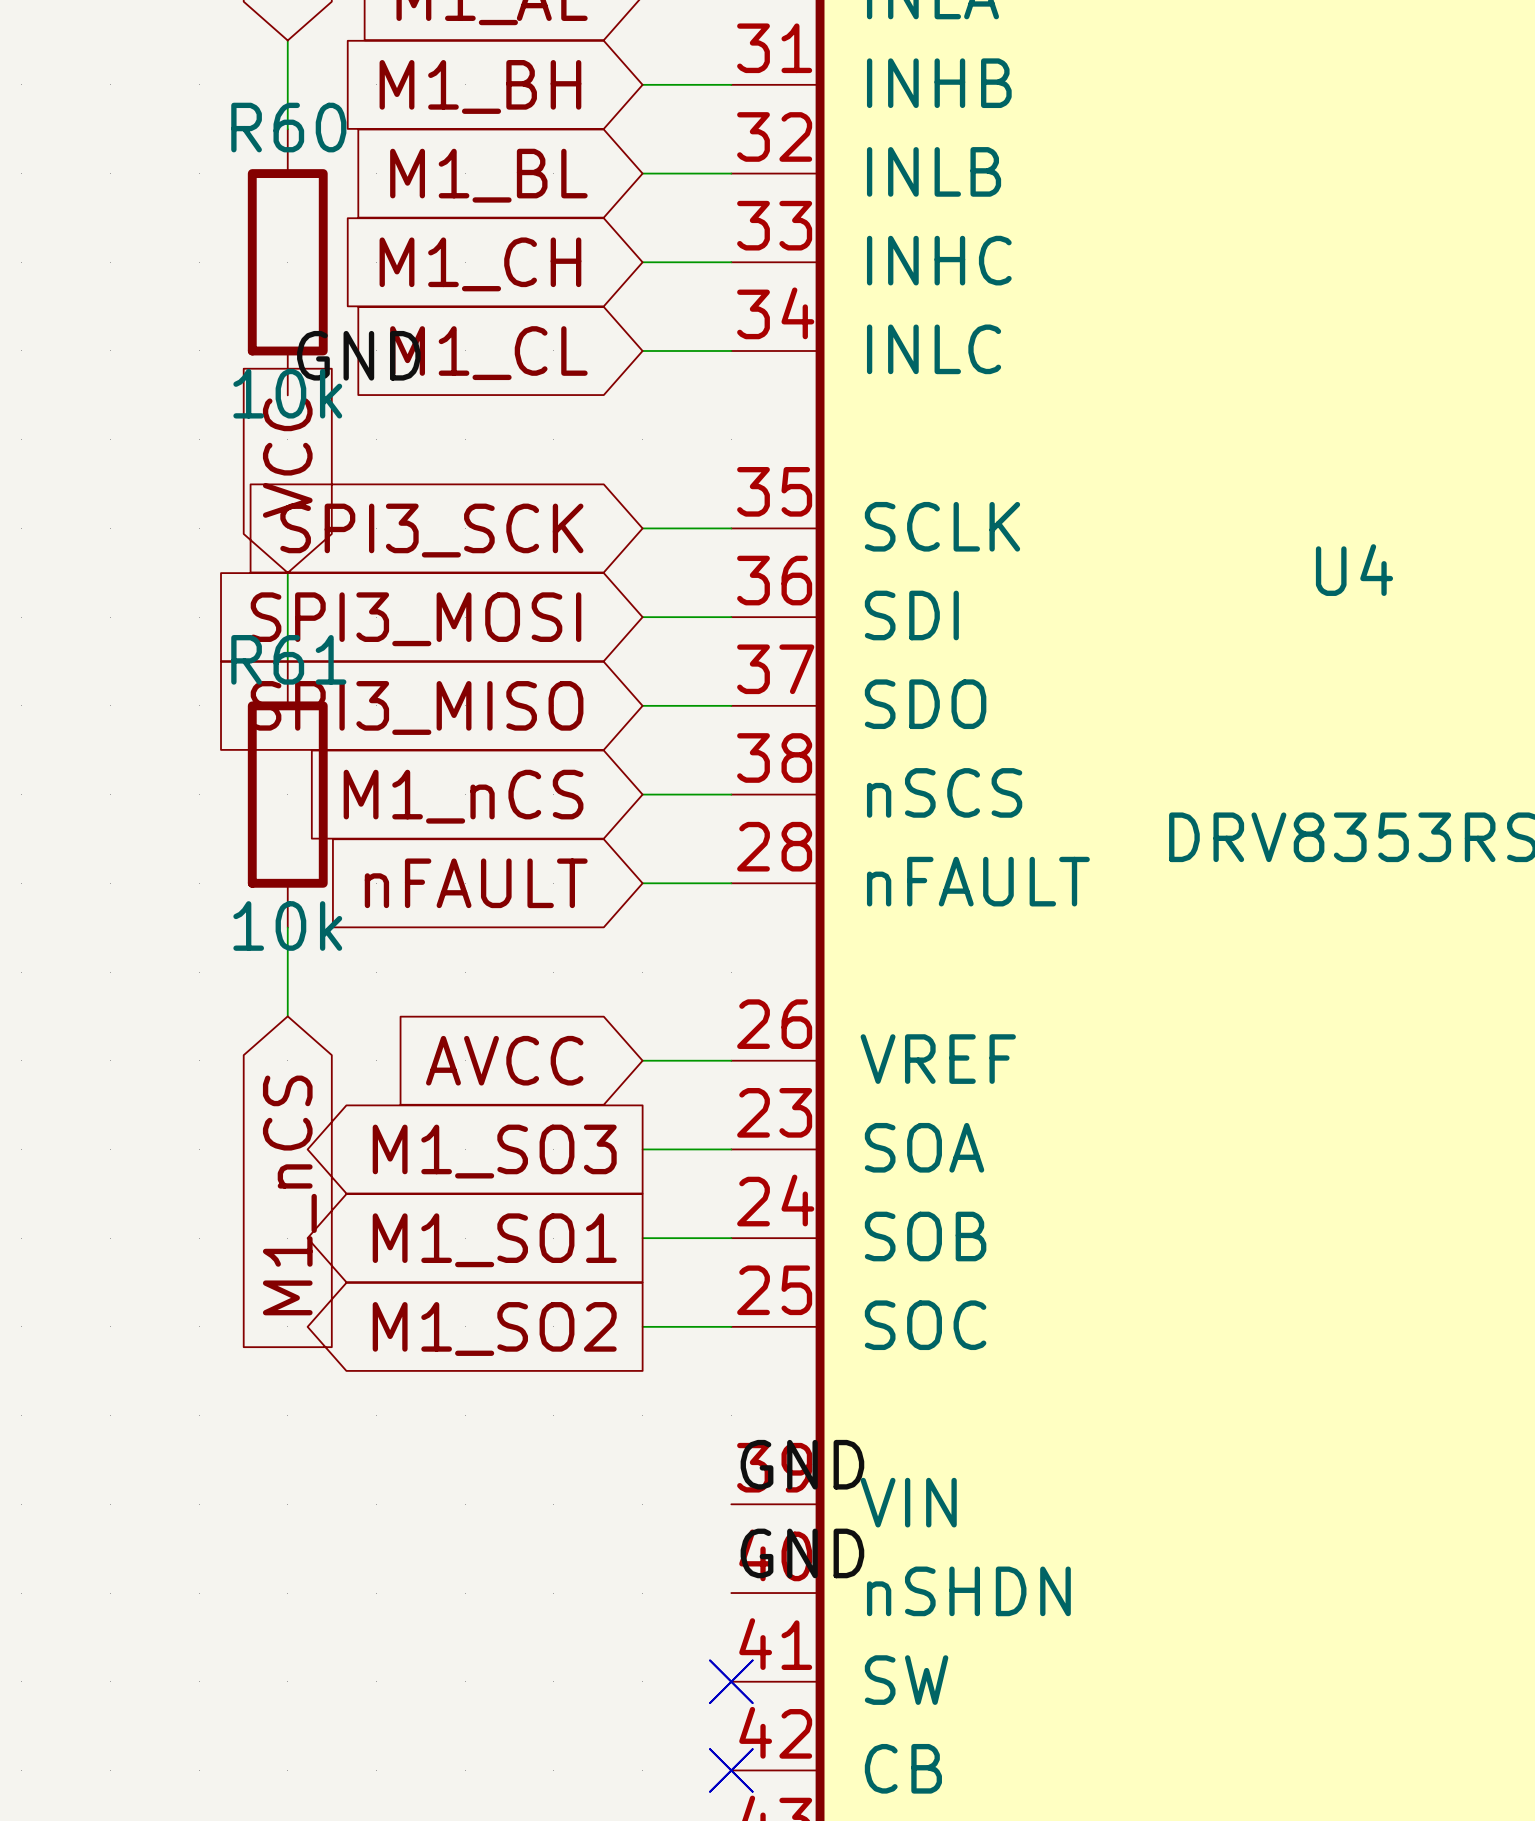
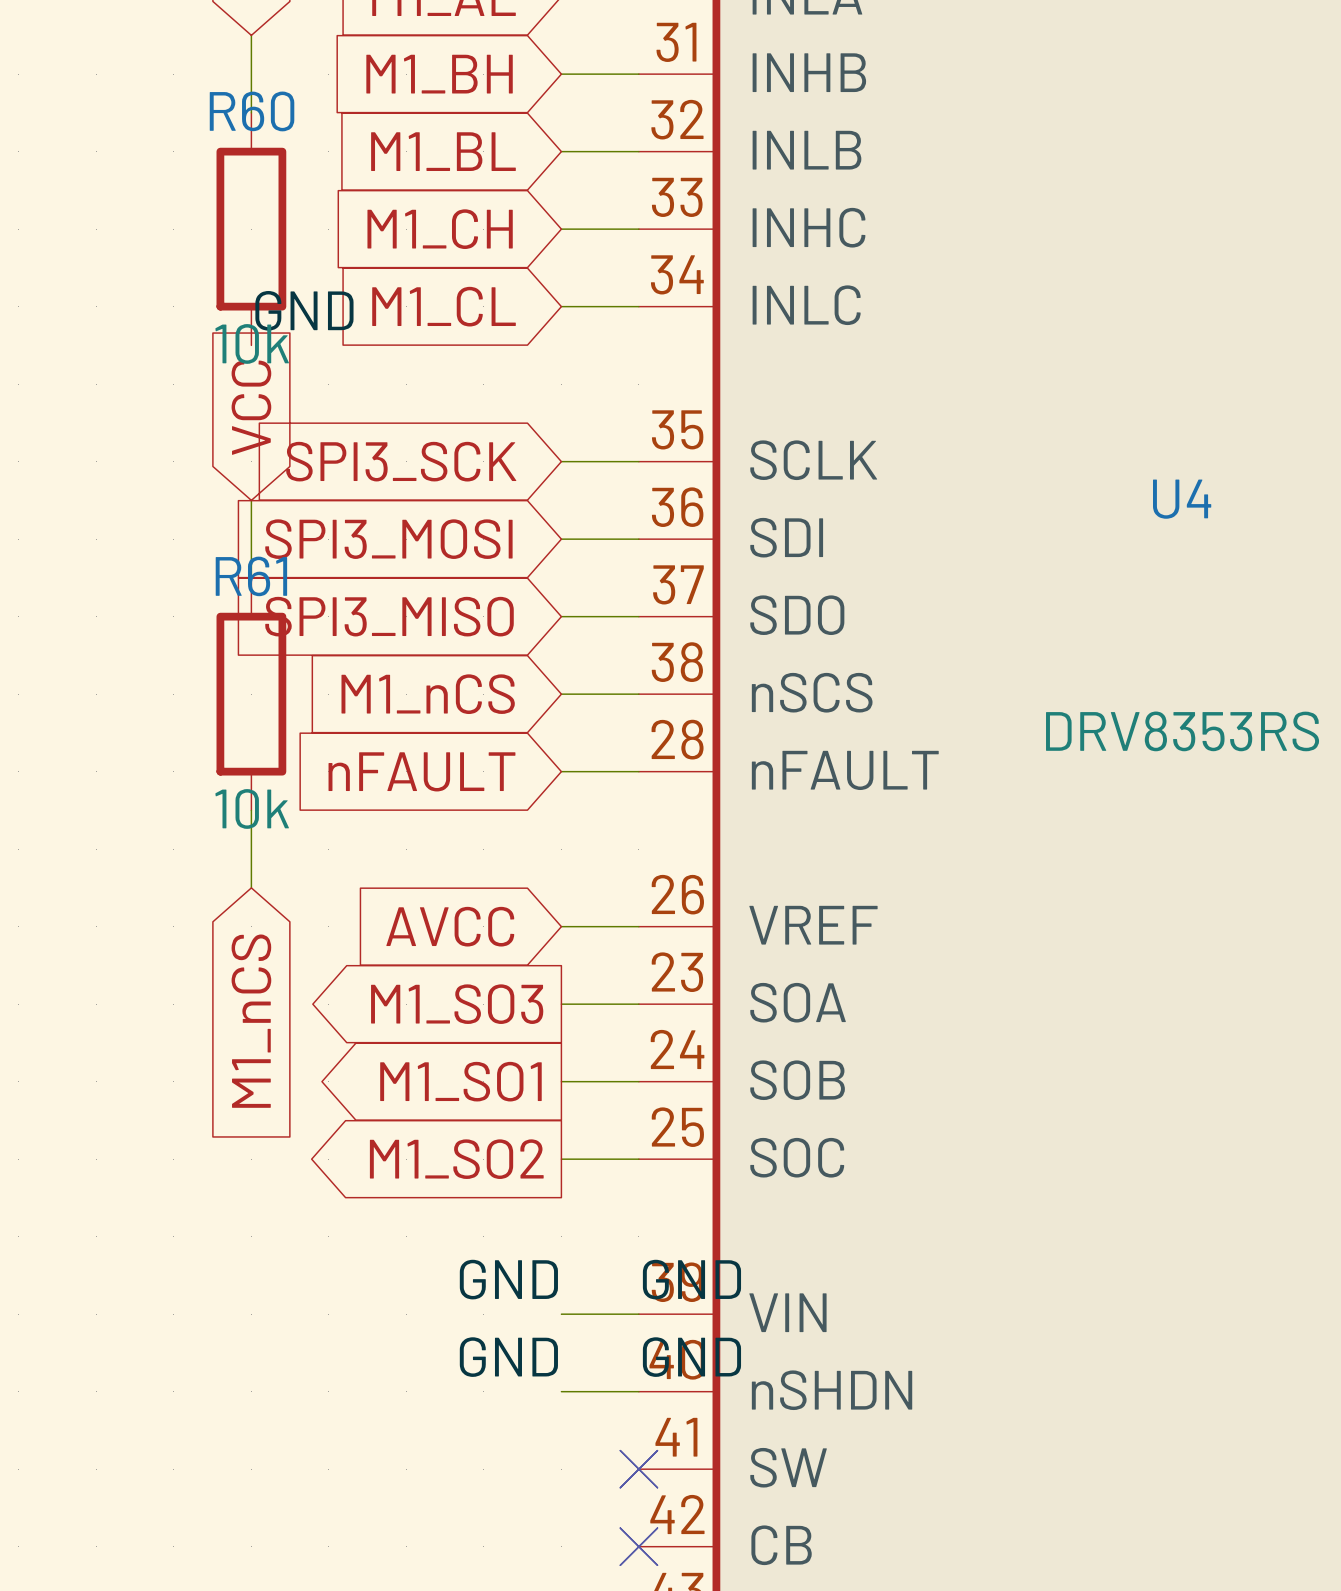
label: none -> GND (508, 1279)
wire: none -> (561, 1314) (638, 1314)
label: none -> GND (508, 1357)
wire: none -> (561, 1391) (638, 1391)

